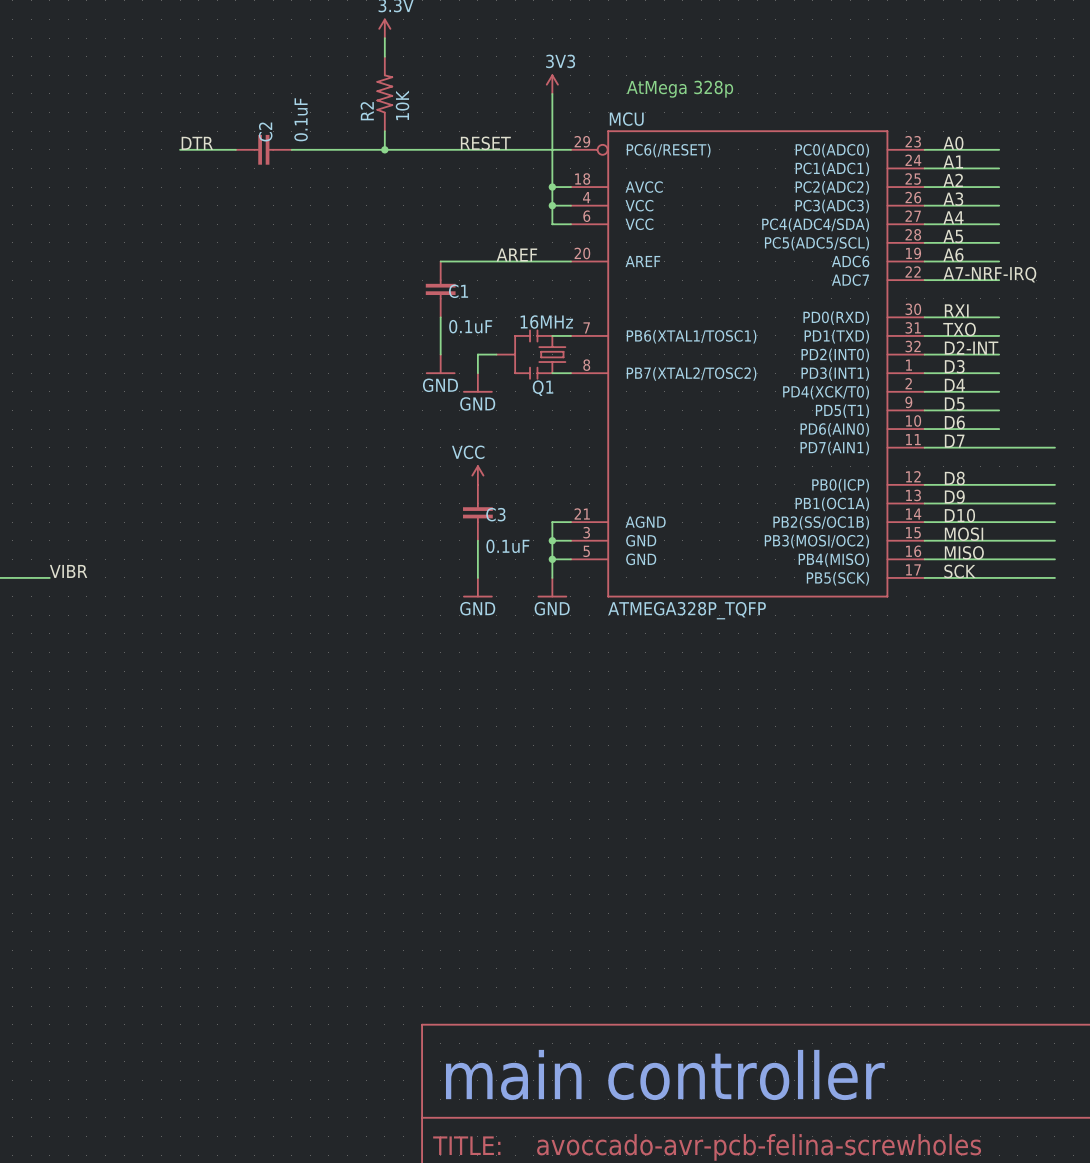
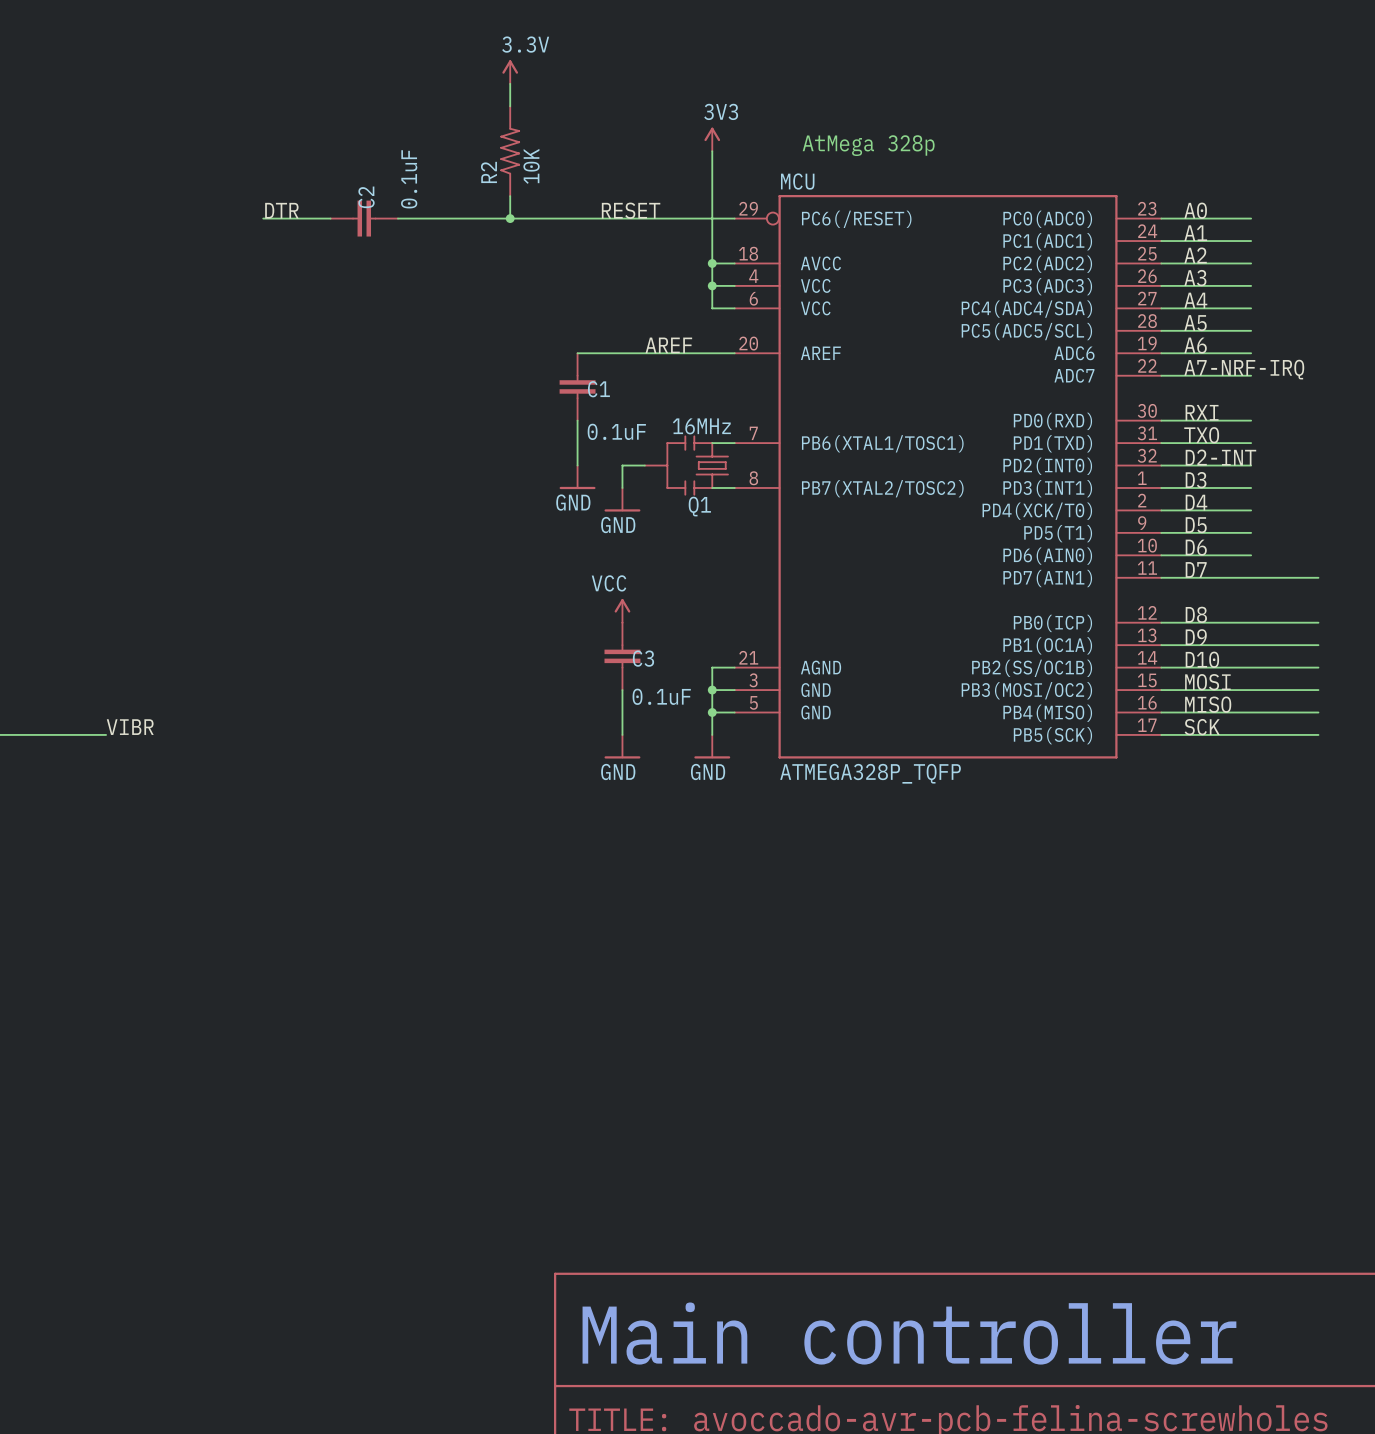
text: main controller (665, 1074) -> Main controller (909, 1333)

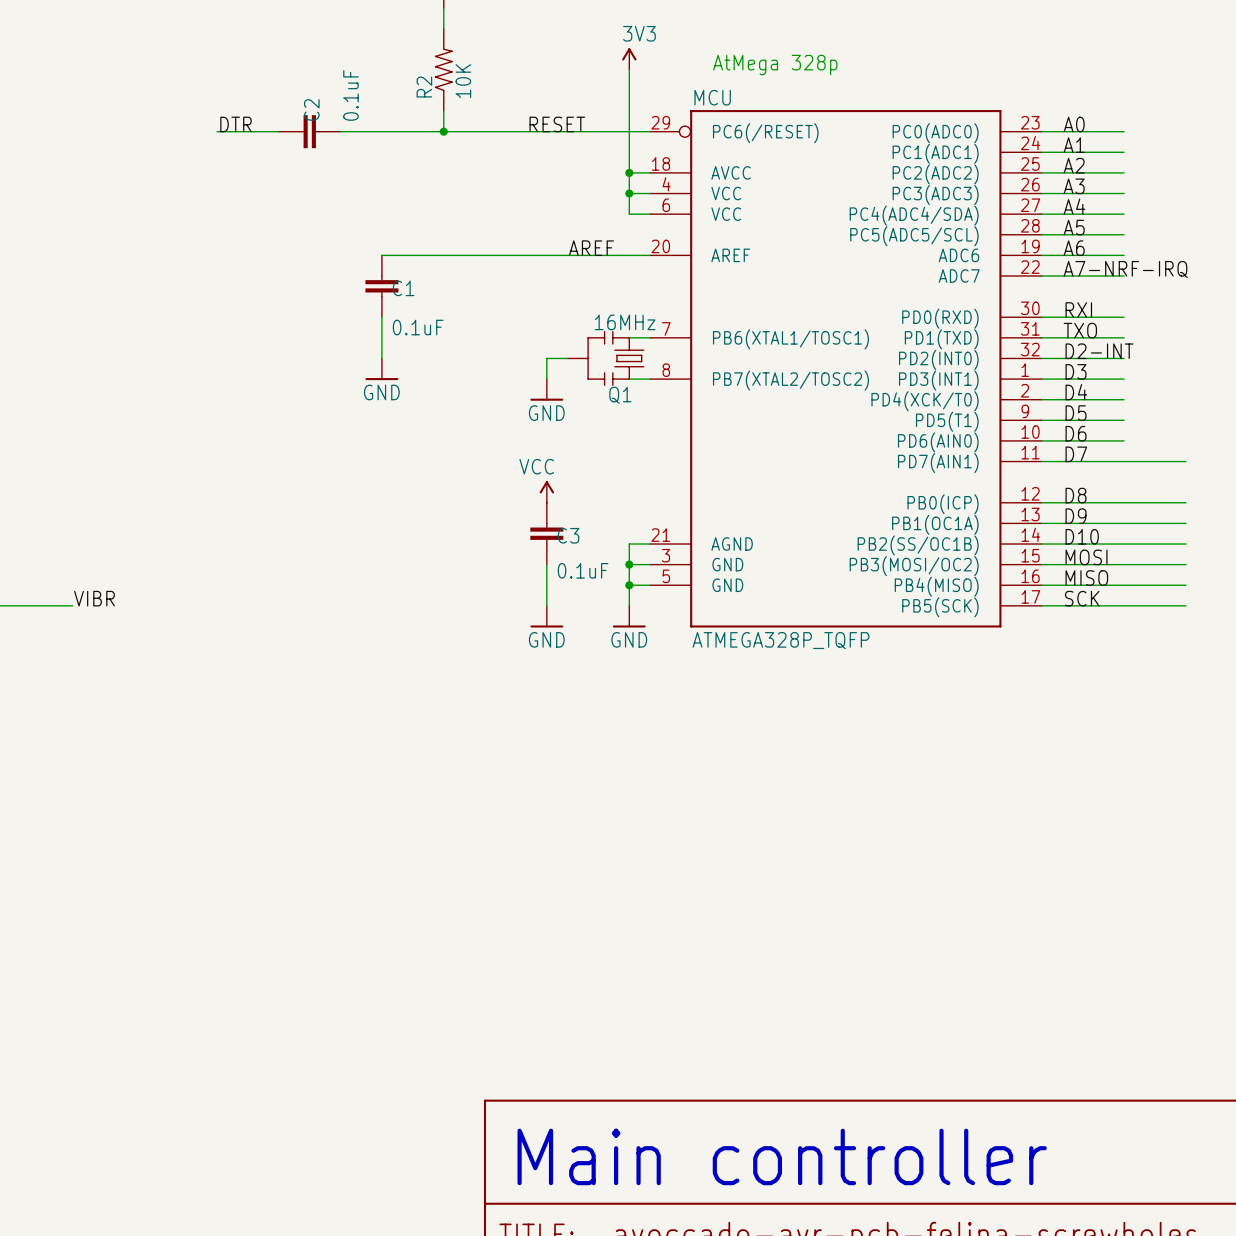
wire: none -> (381, 255) (505, 255)
C1 position: (577, 386) -> (381, 286)
wire: (577, 420) (577, 465) -> (381, 317) (381, 358)
power symbol position: GND (577, 477) -> GND (381, 369)

